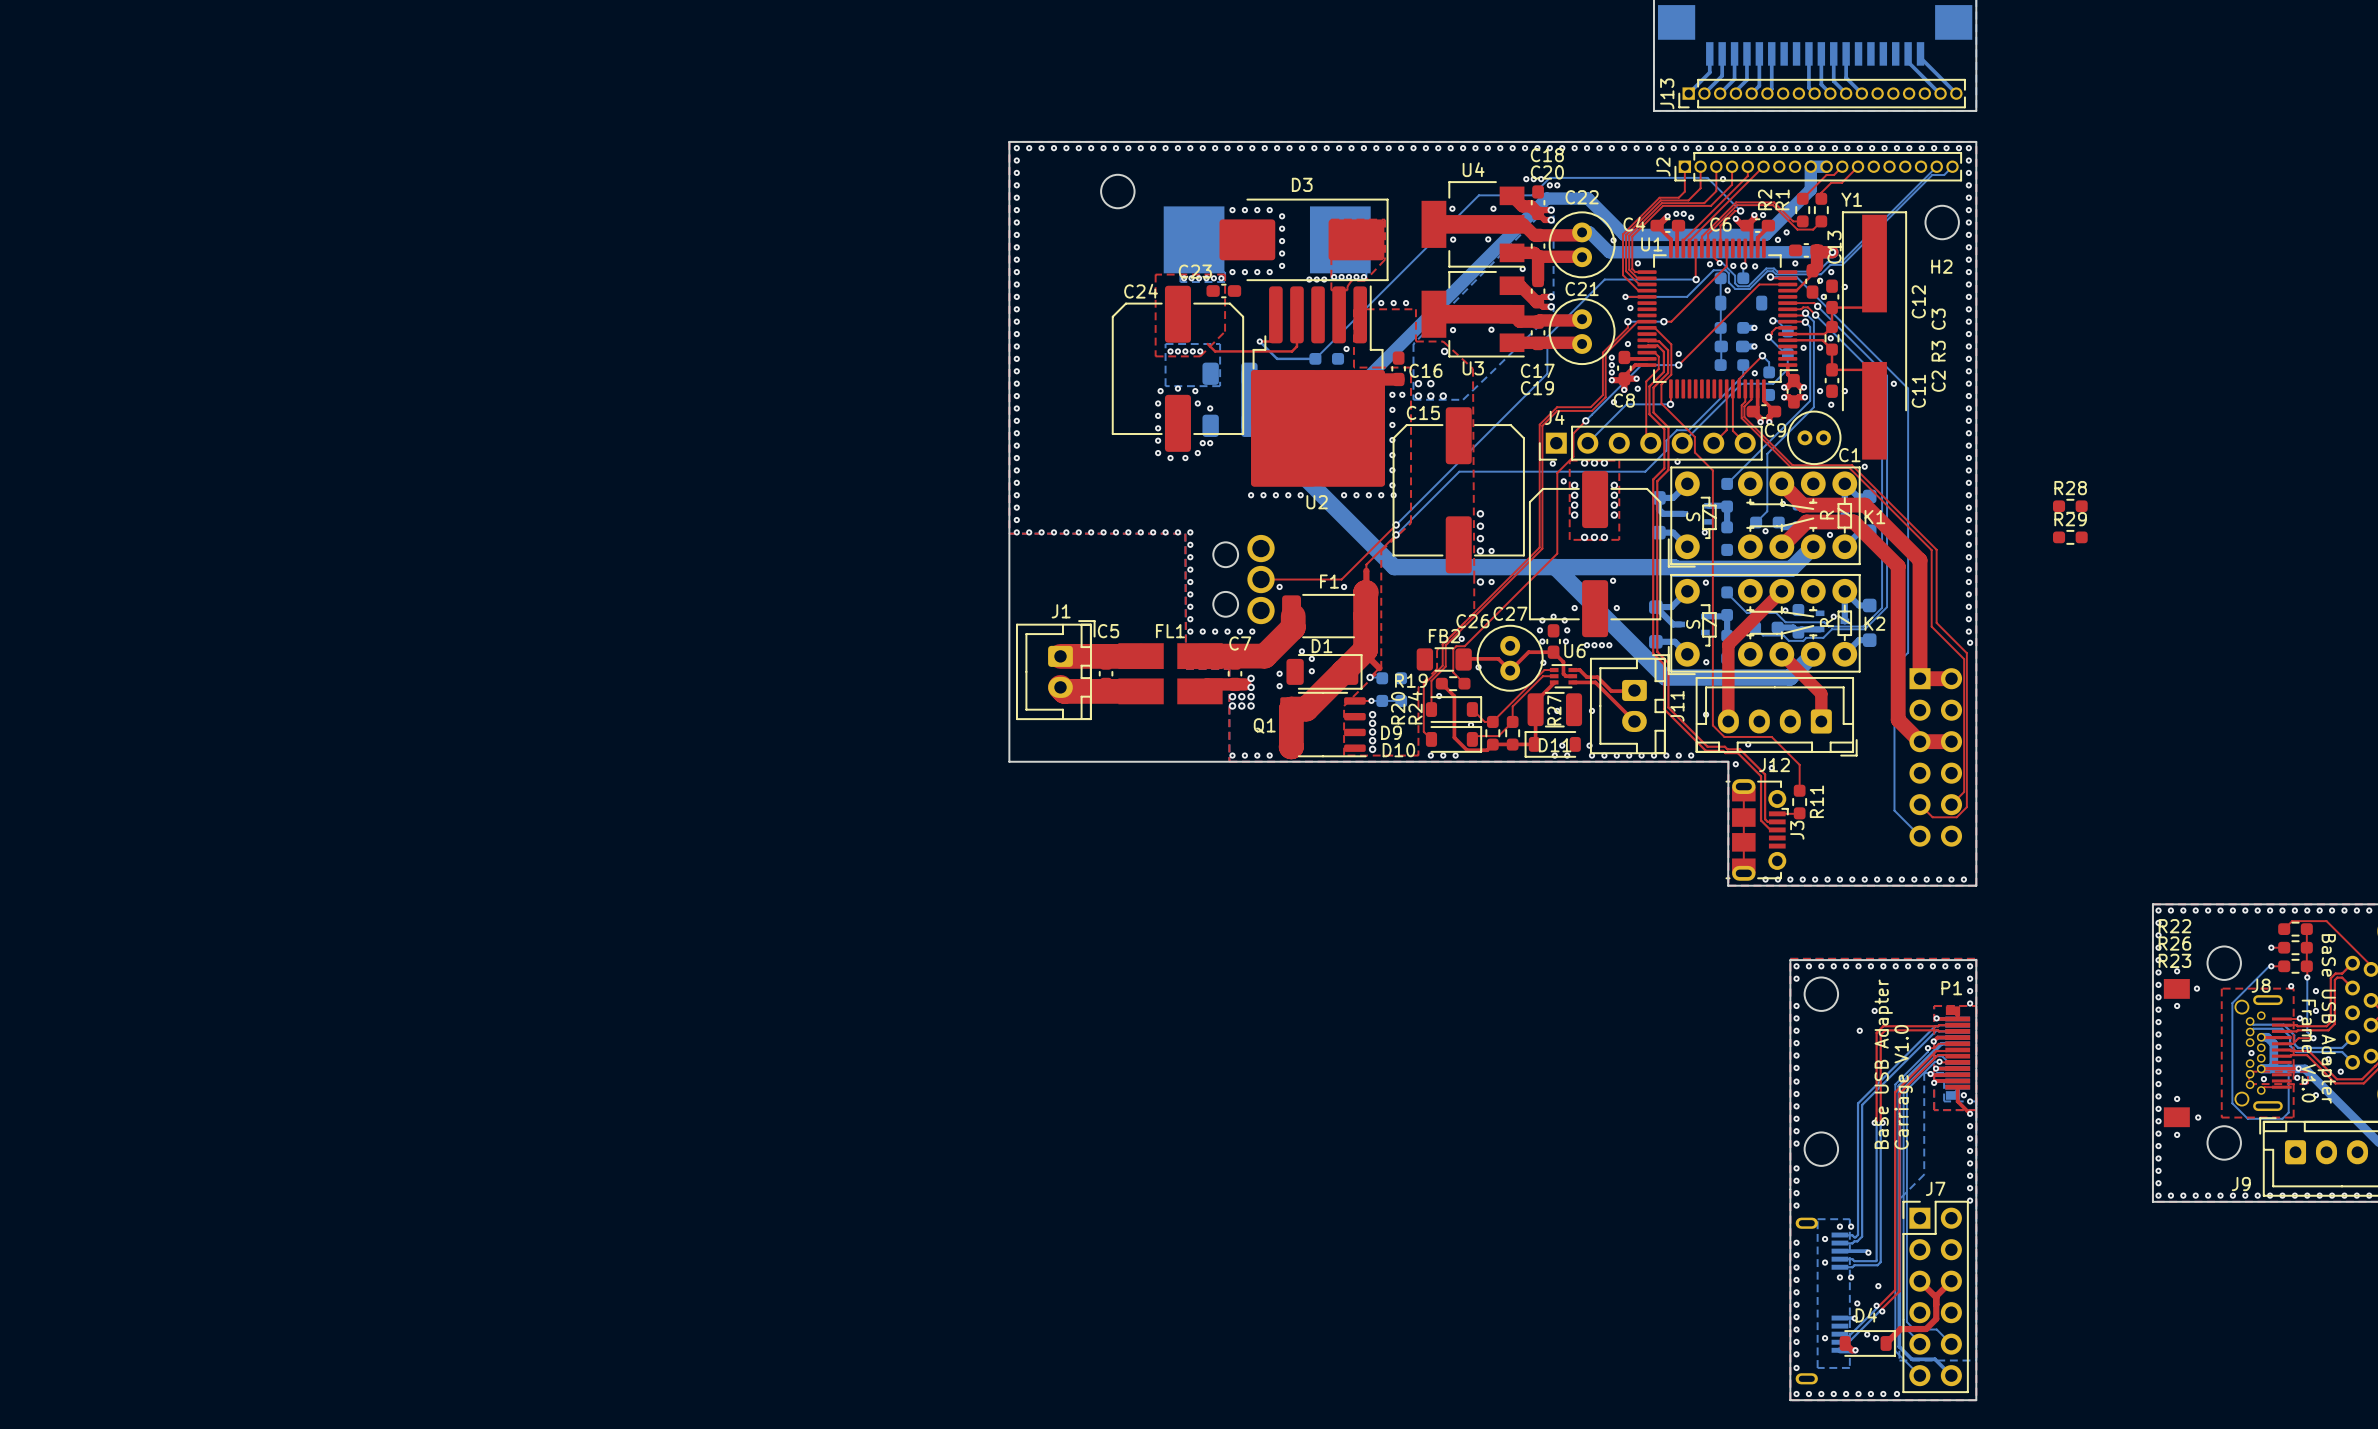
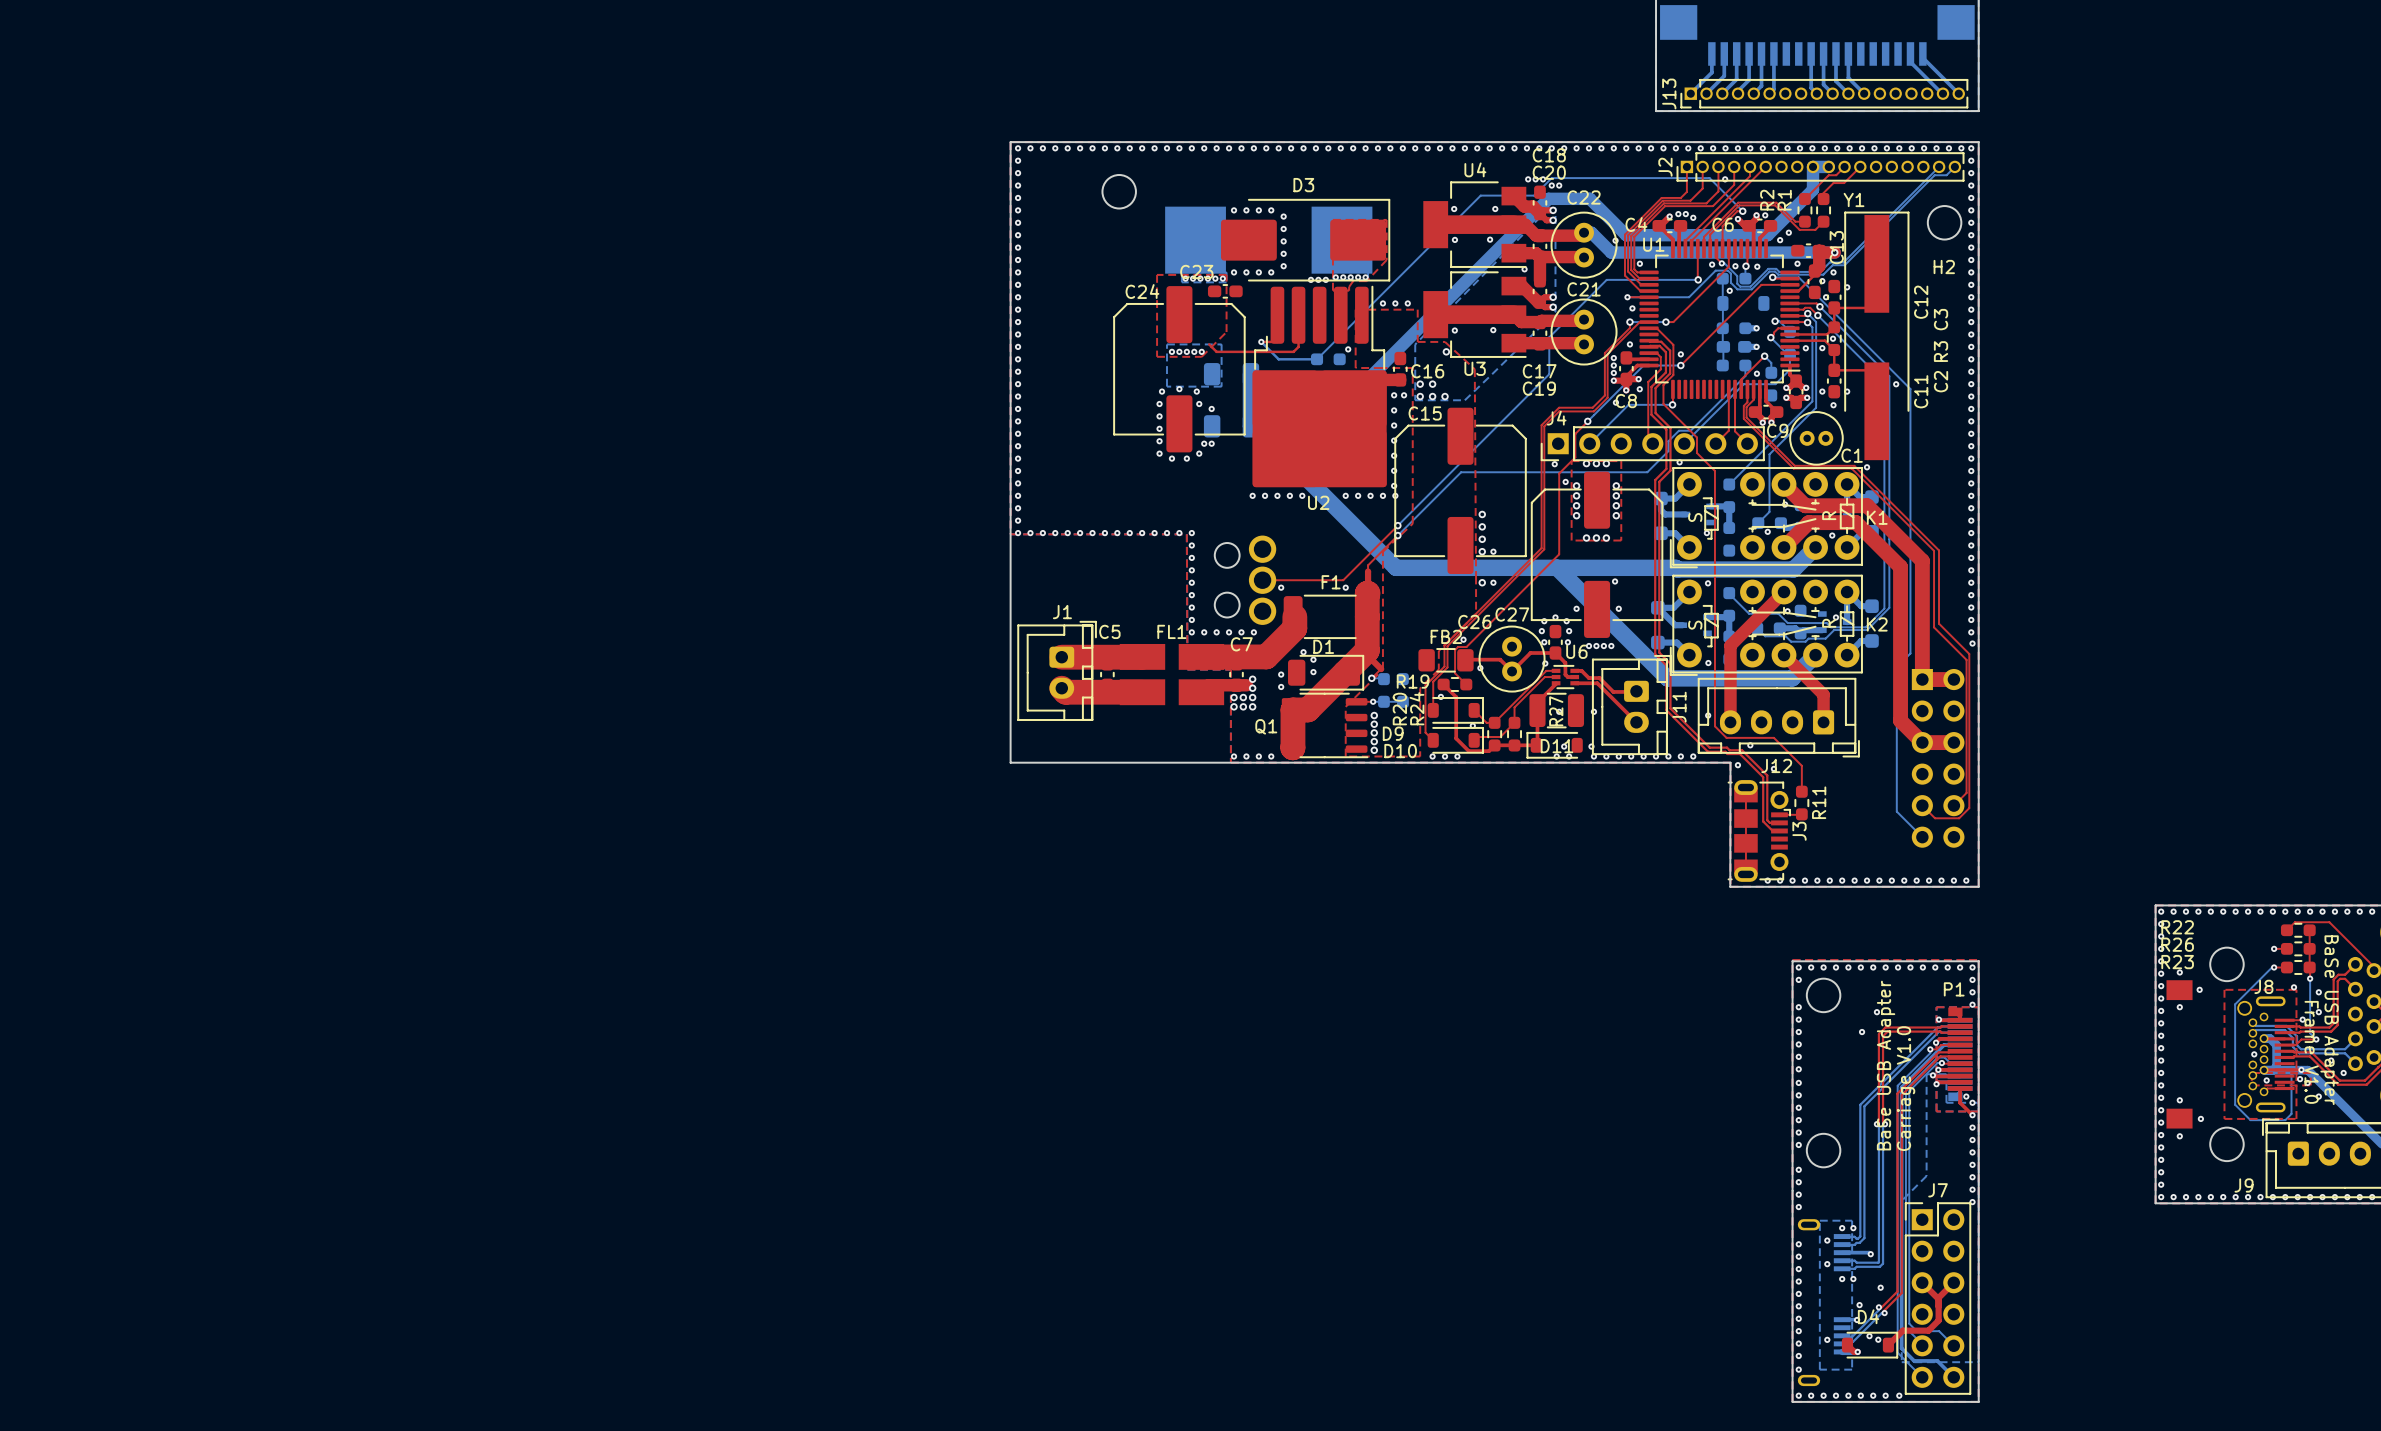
R28: (2070, 506) -> none
R29: (2070, 537) -> none

